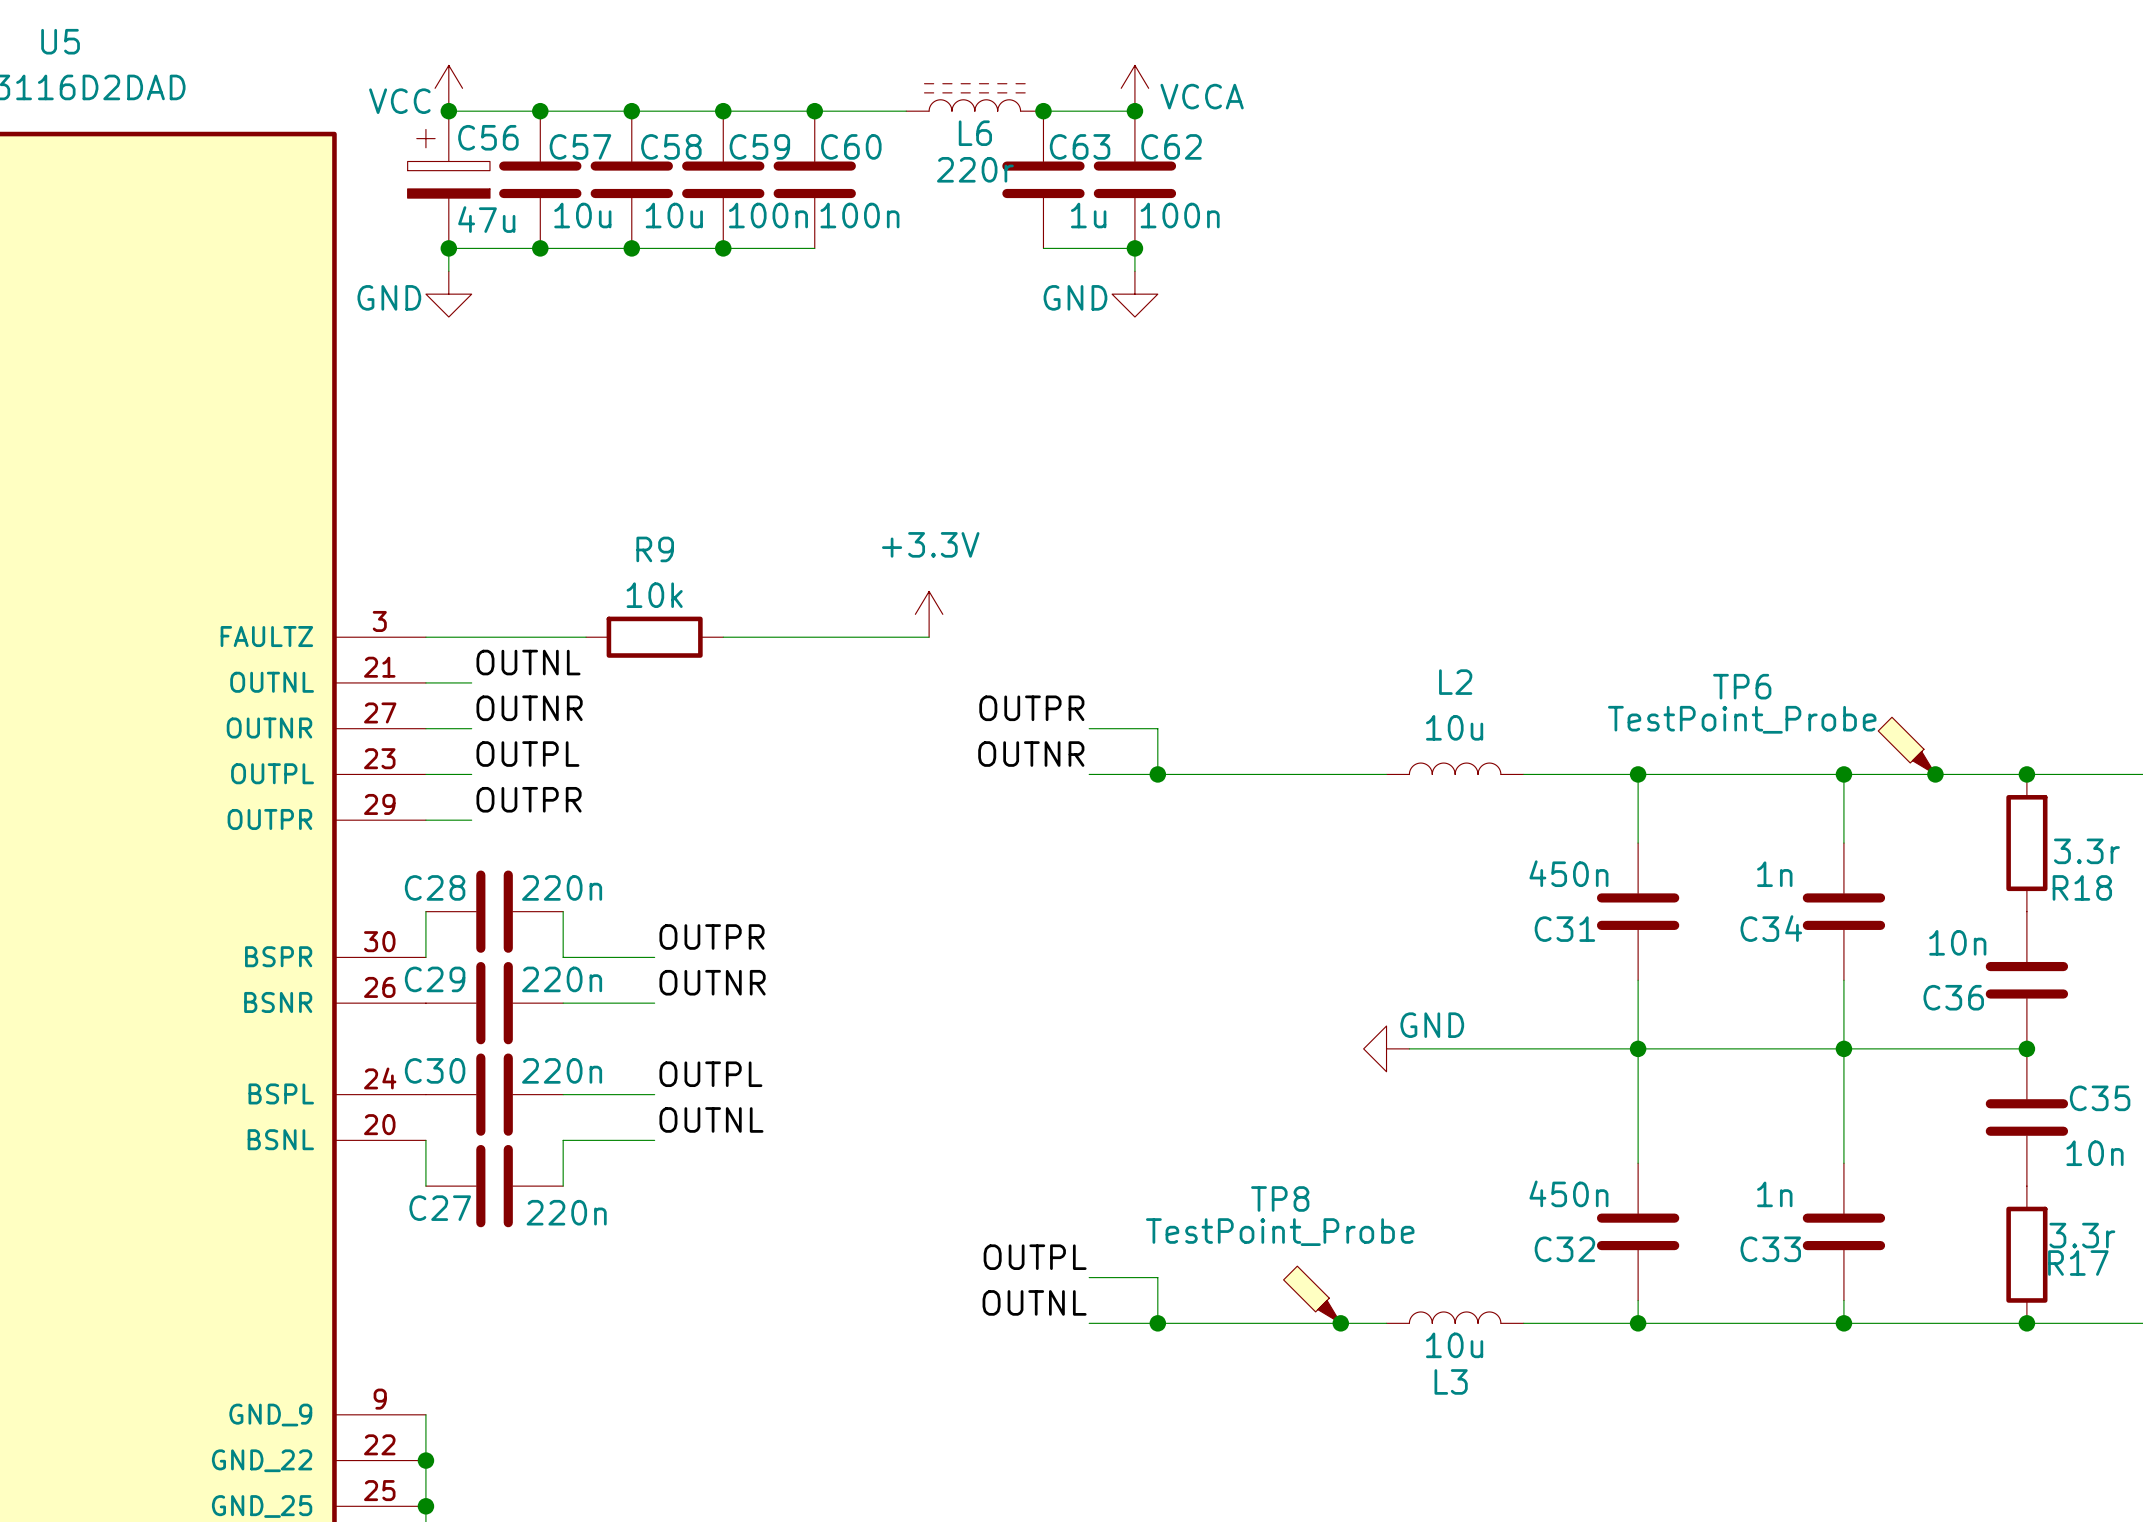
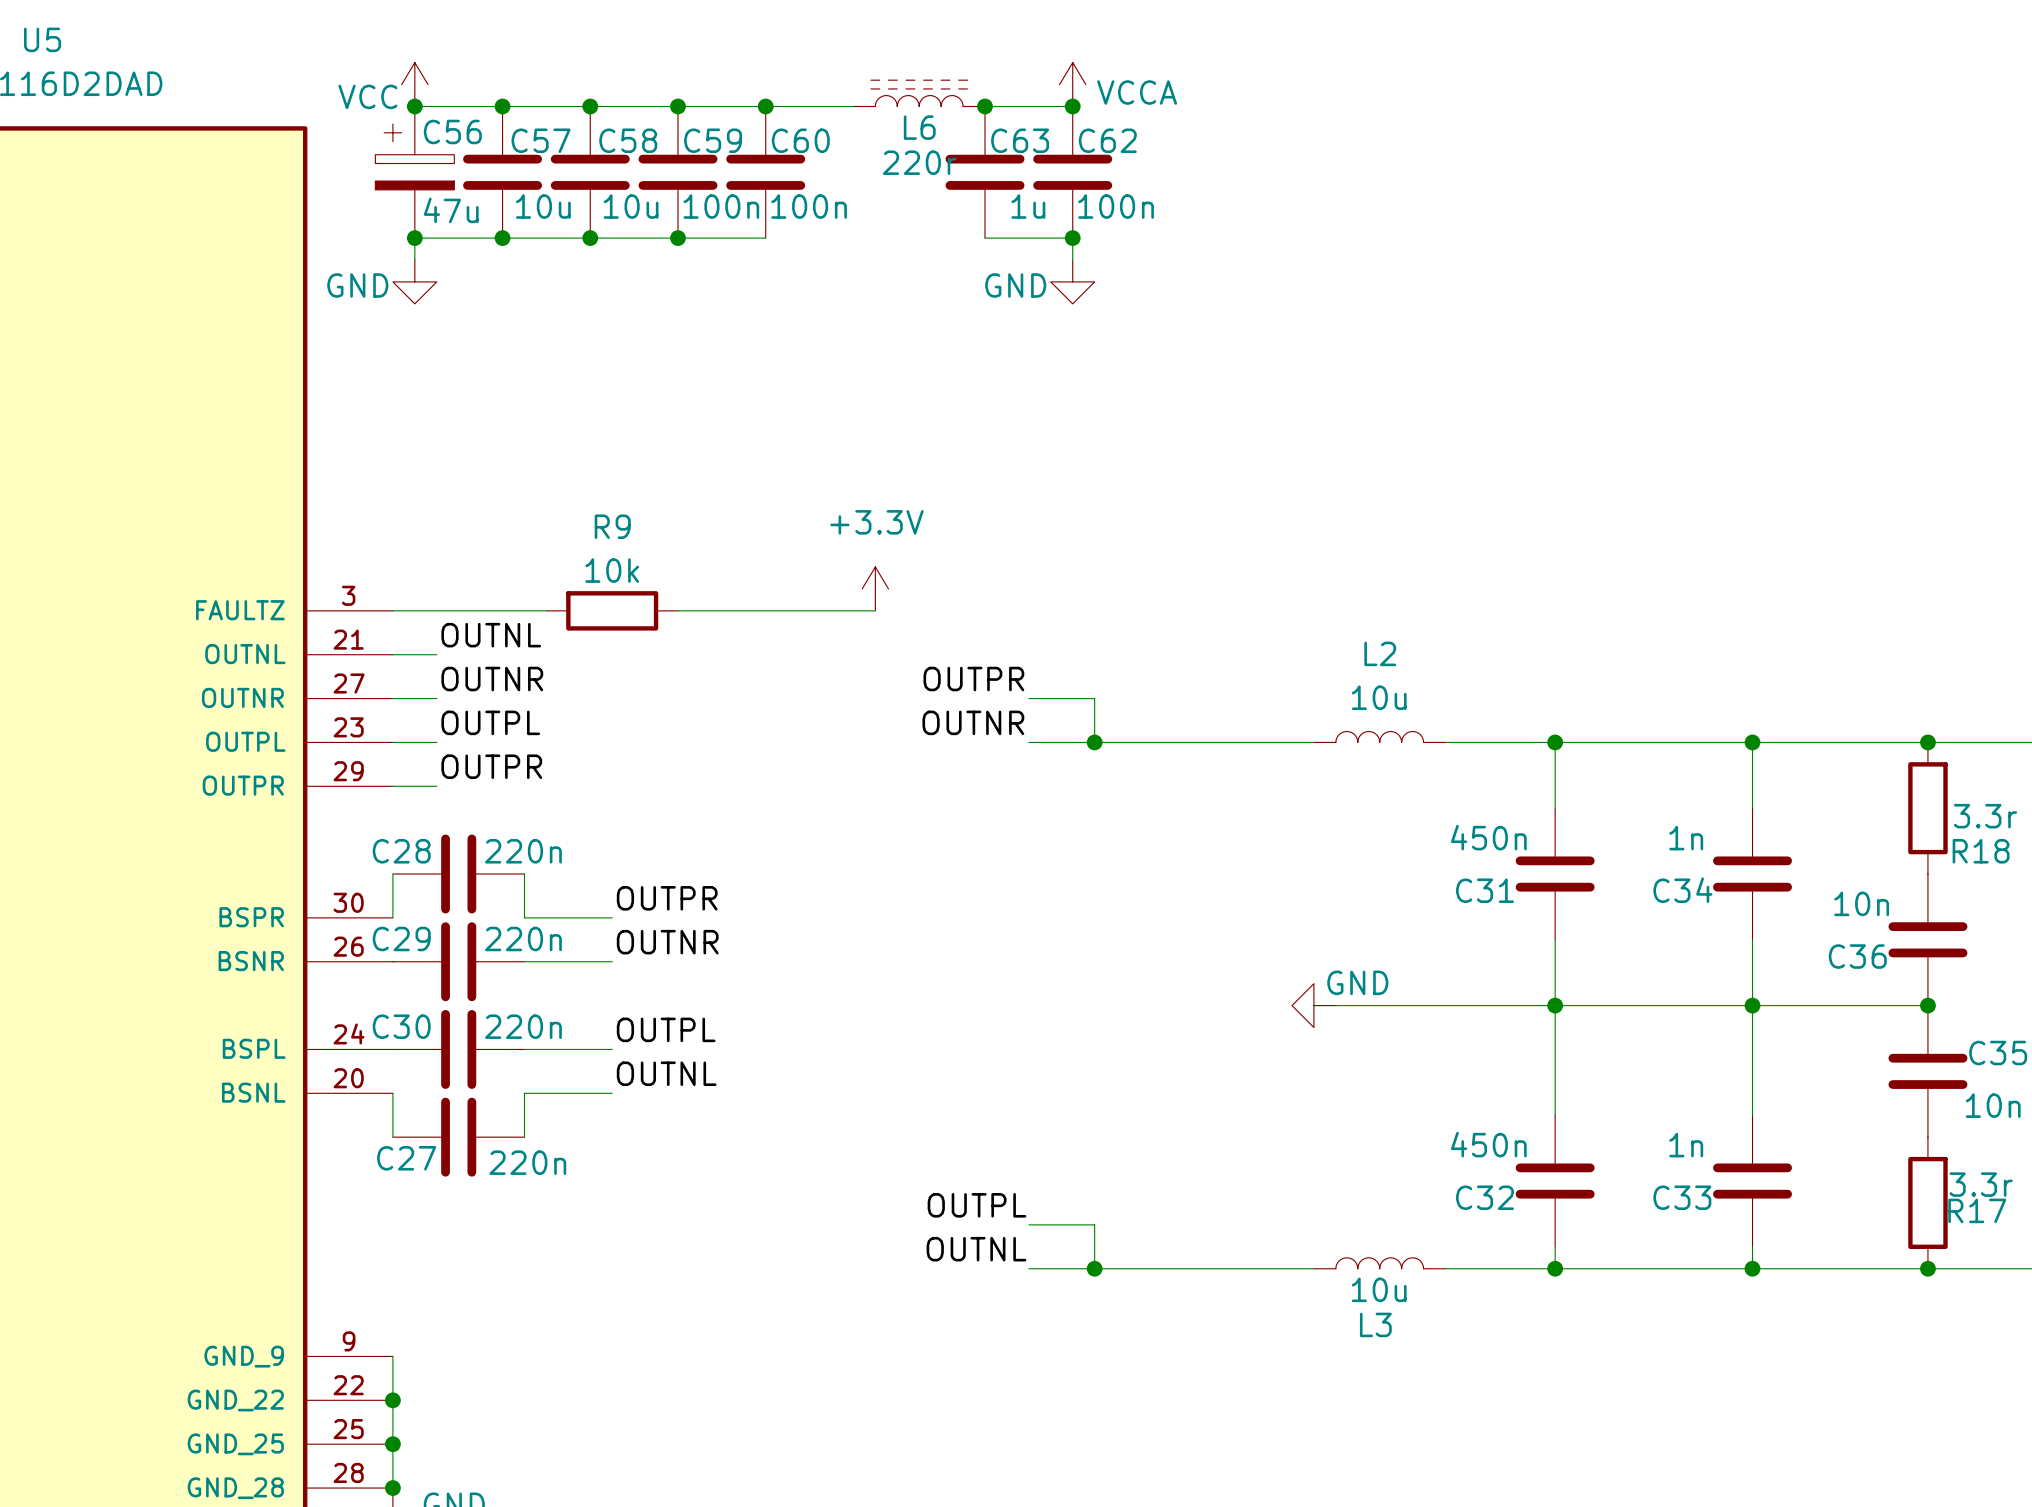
TP6: TestPoint_Probe (1906, 745) -> none
junction: (1935, 774) -> none
TP8: TestPoint_Probe (1312, 1294) -> none
junction: (1340, 1323) -> none

